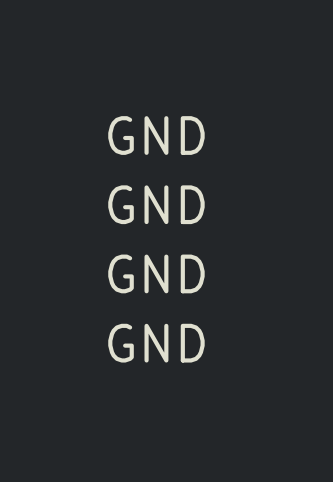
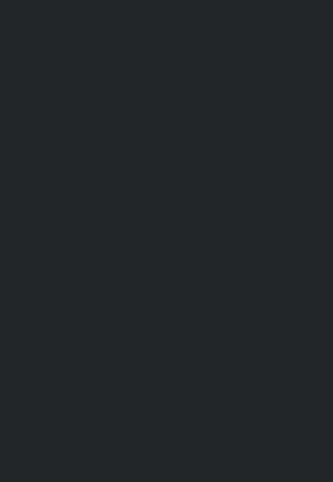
label: GND (156, 135) -> none
label: GND (156, 204) -> none
label: GND (156, 273) -> none
label: GND (156, 343) -> none

